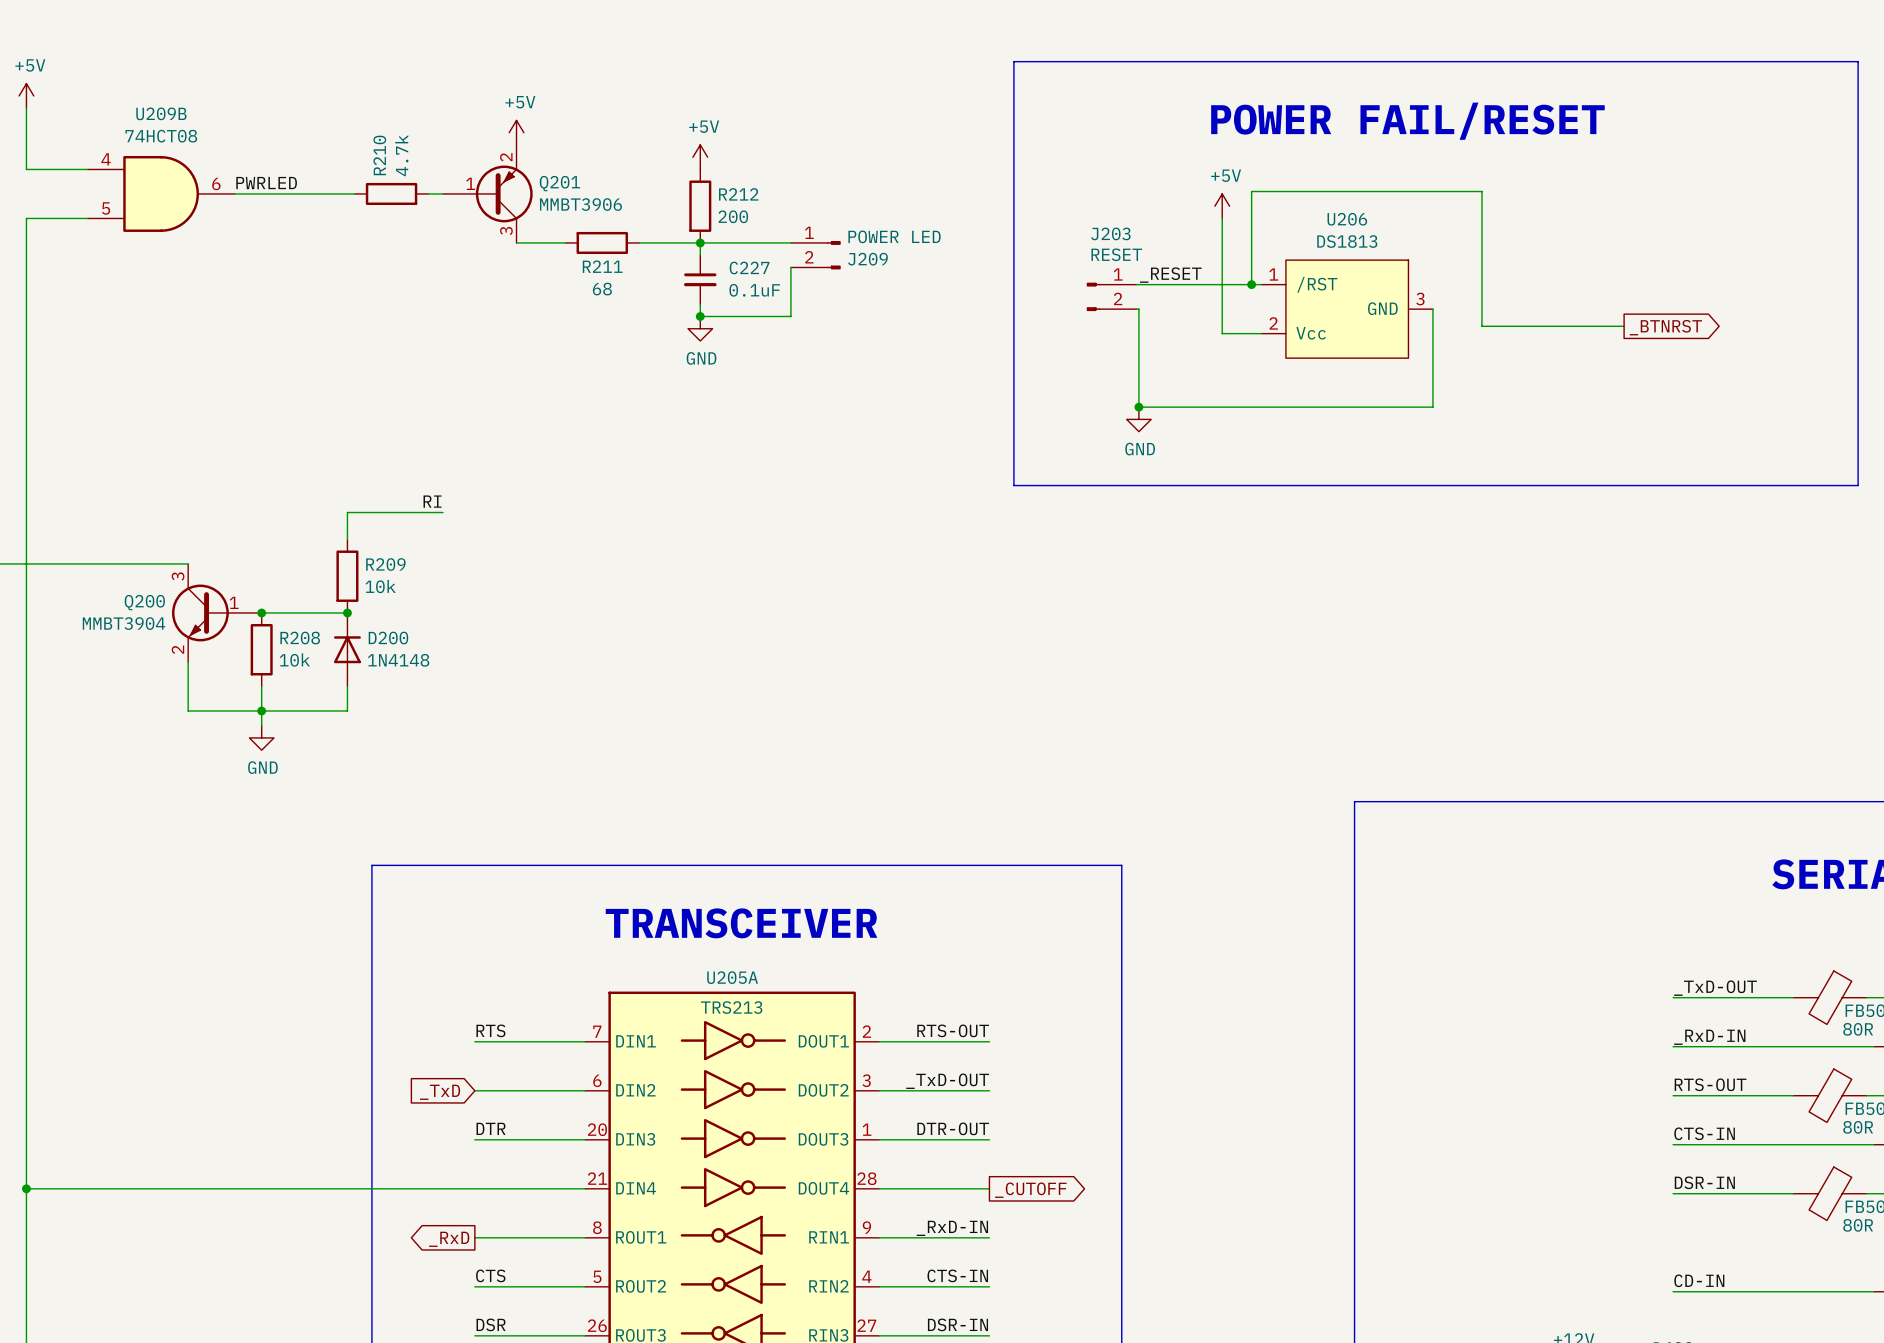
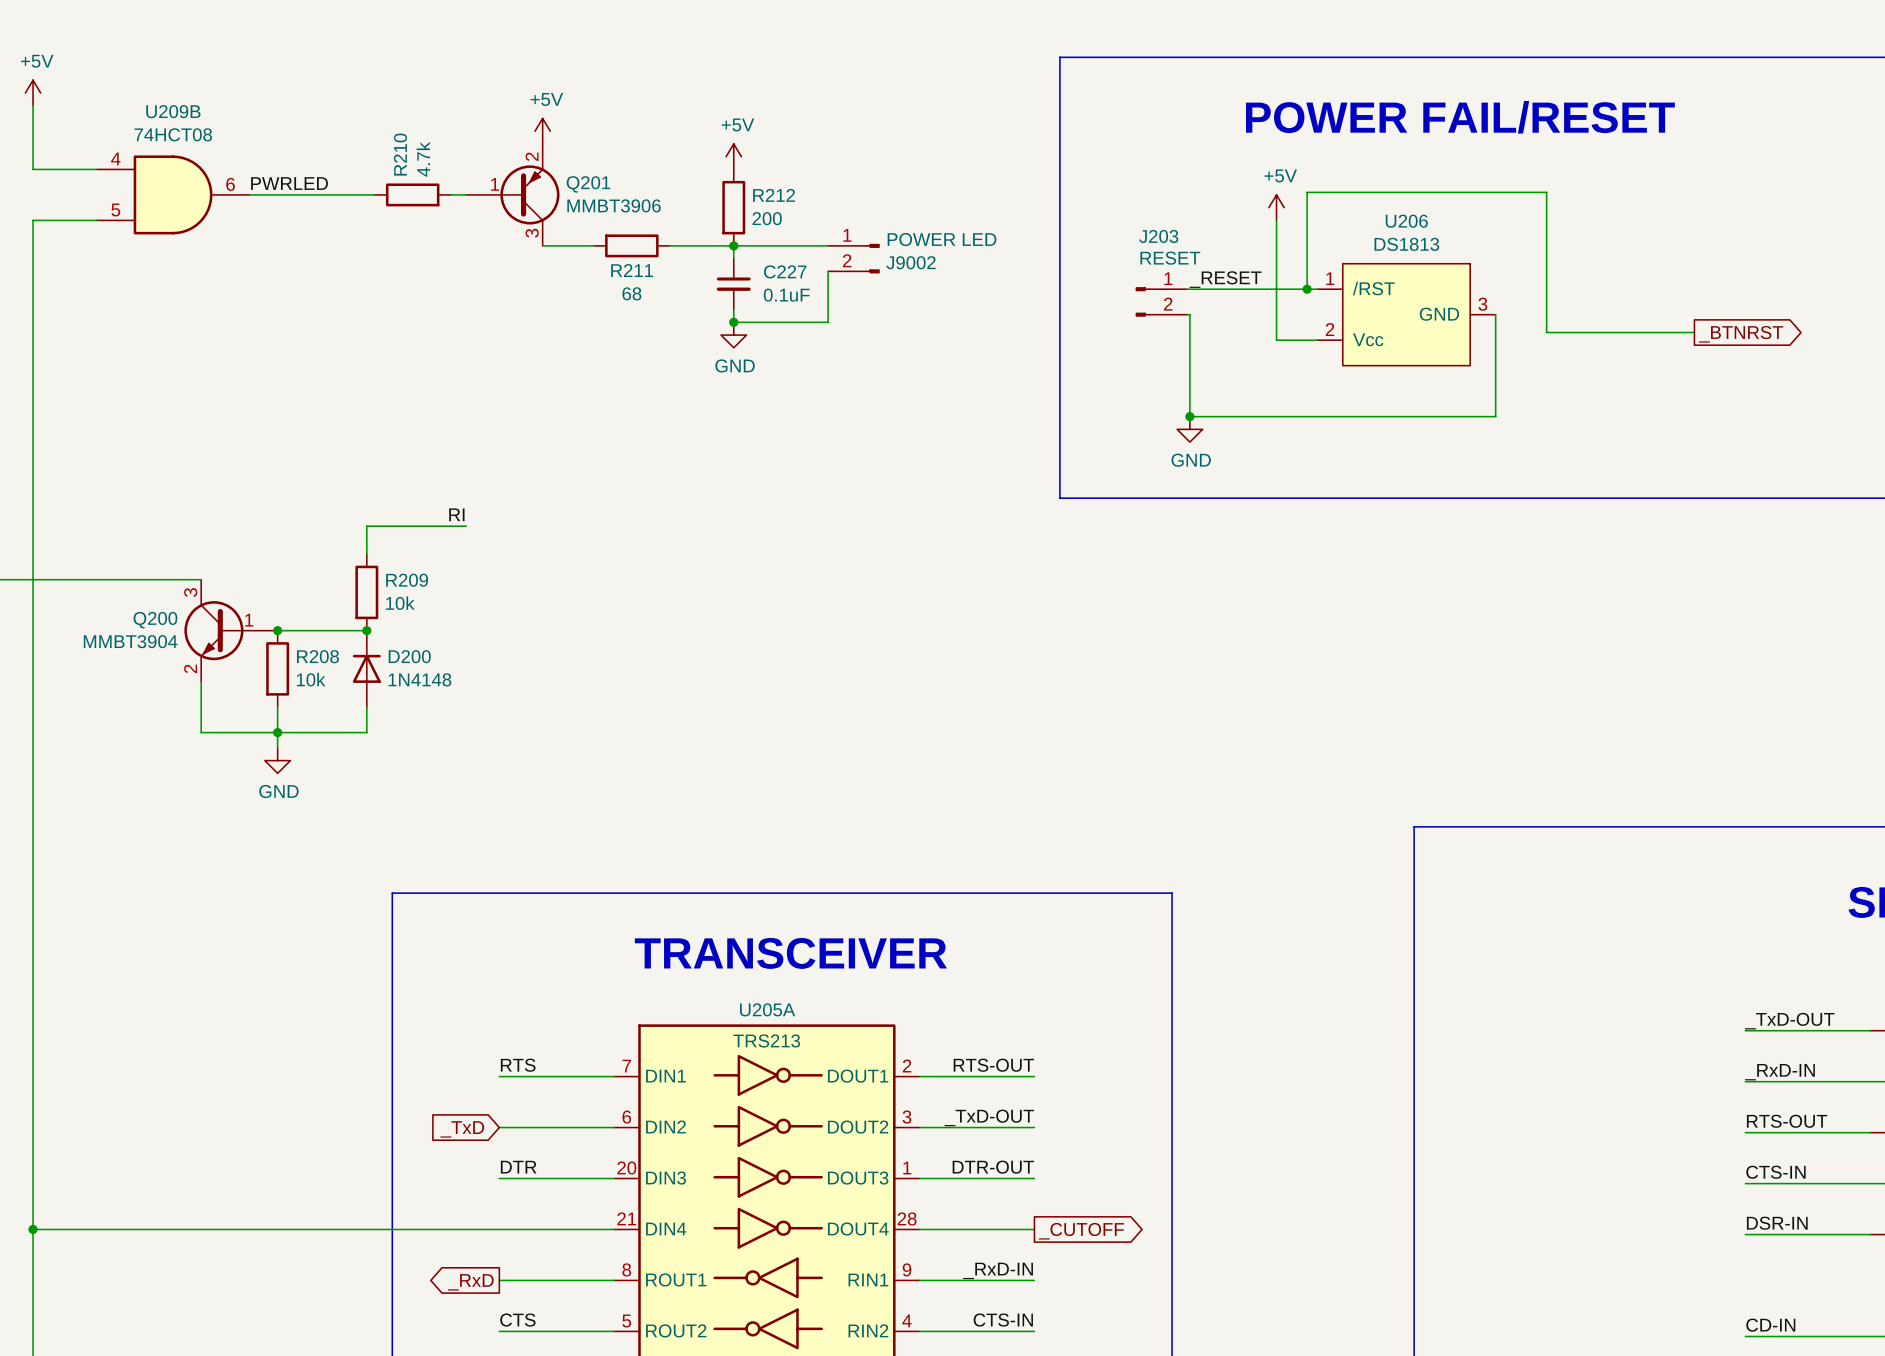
J209 name: J209 (867, 259) -> J9002 (911, 262)

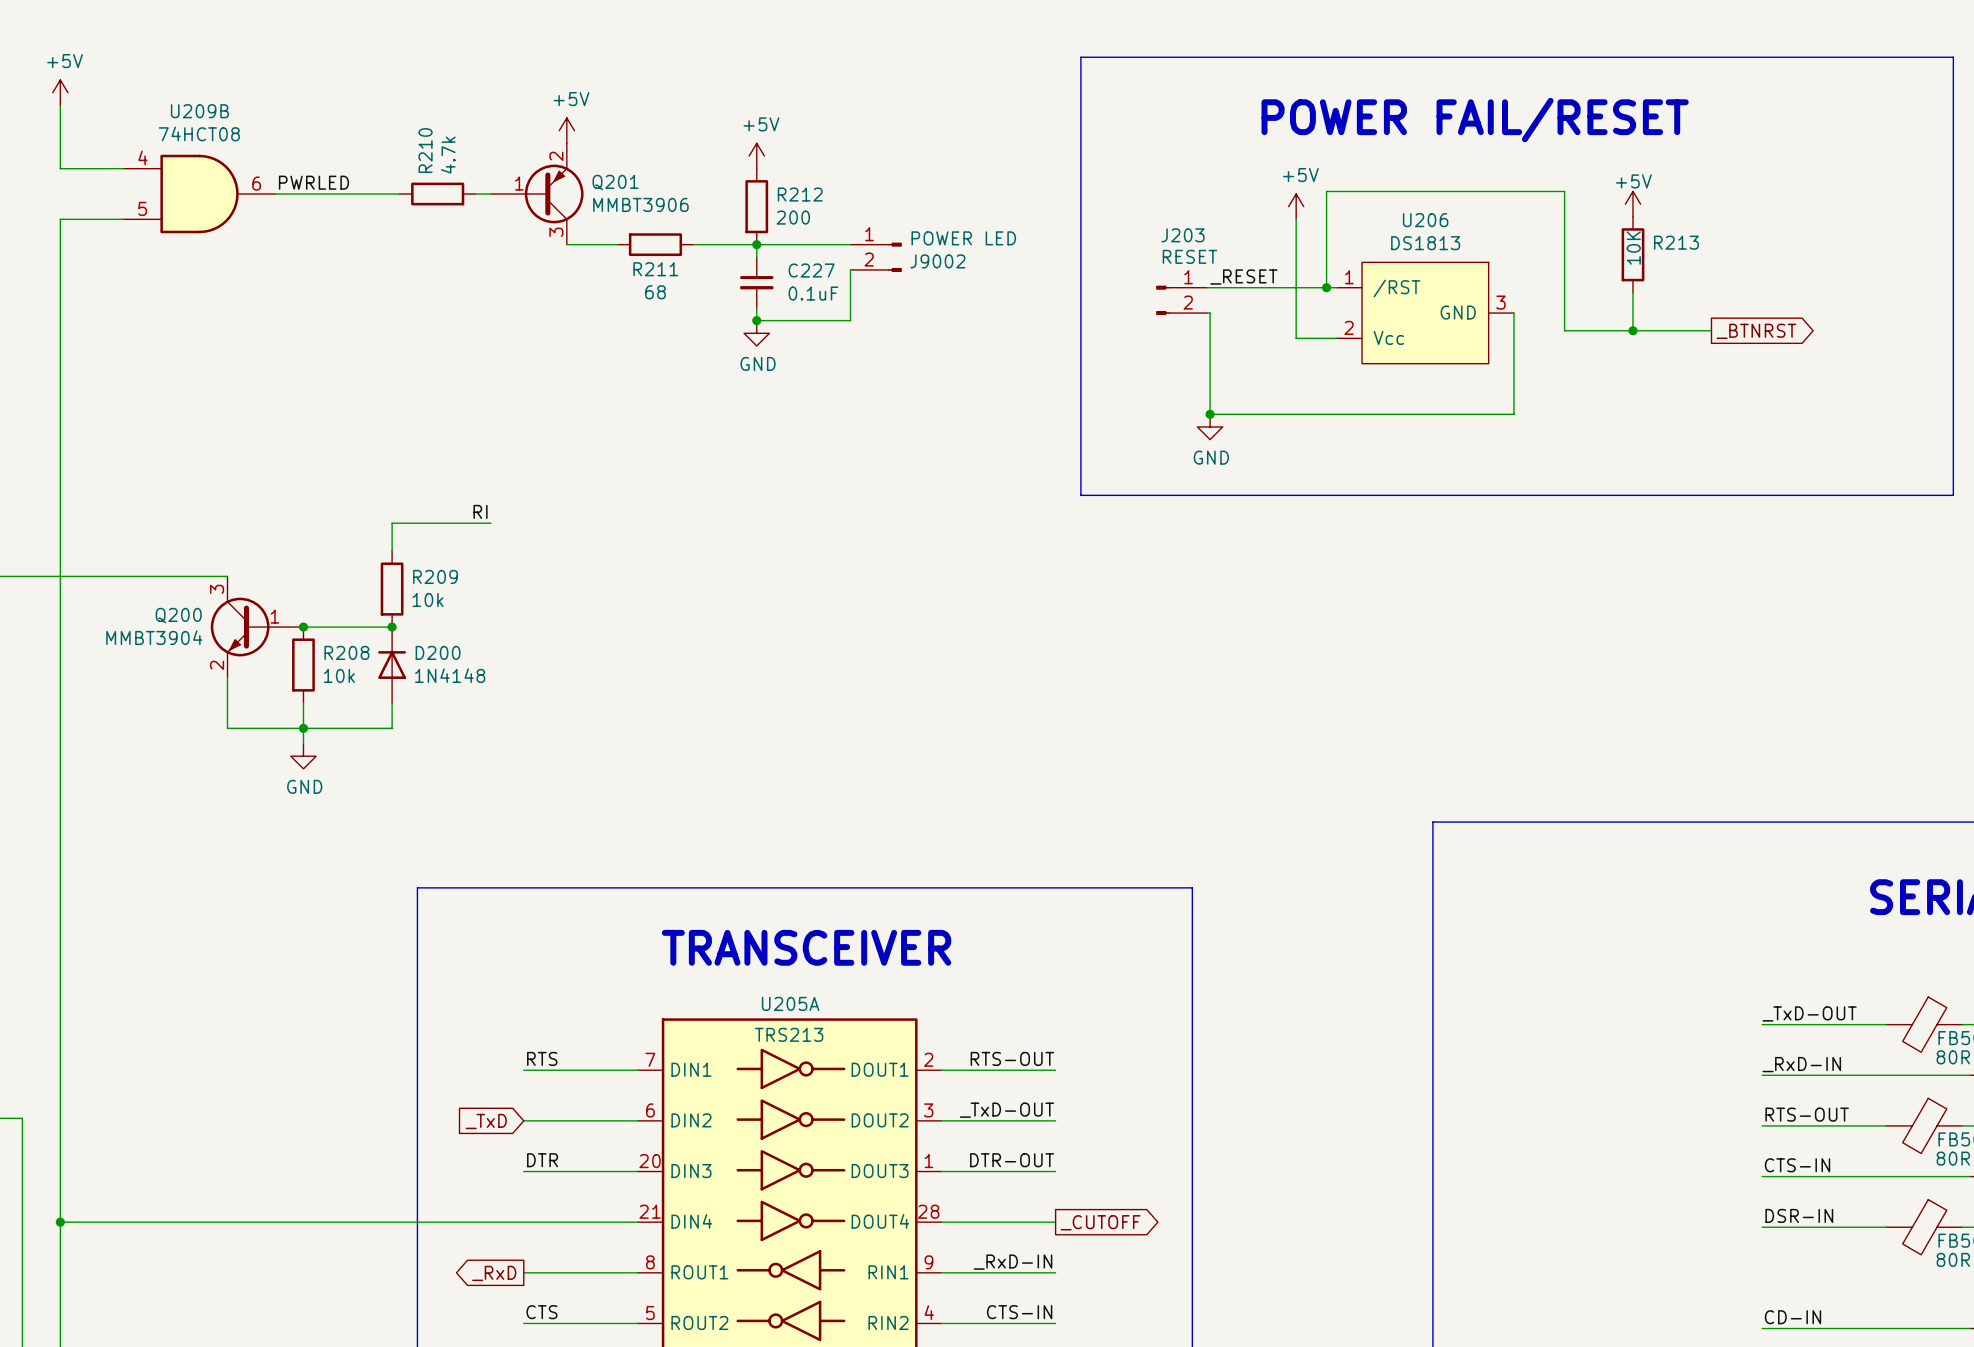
power symbol: none -> +5V (1632, 204)
R213: none -> 10K (1632, 254)
wire: none -> (1632, 292) (1632, 330)
junction: none -> (1632, 330)

